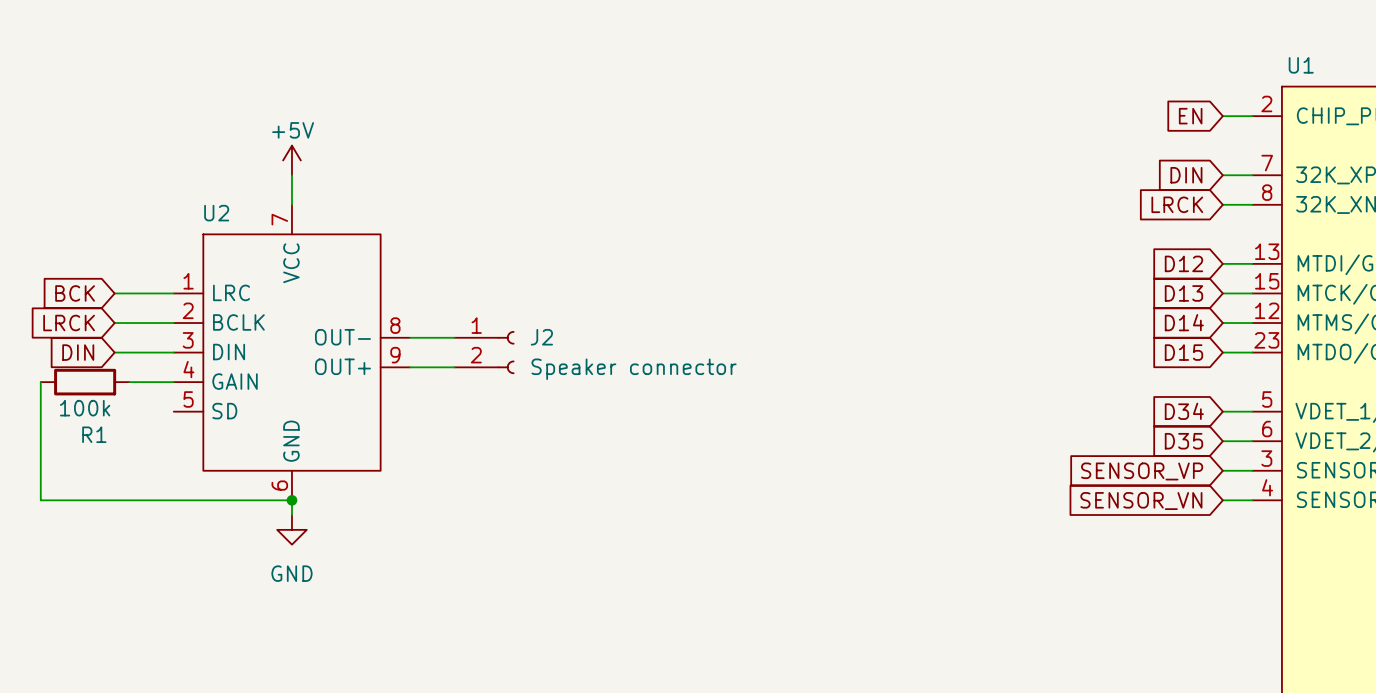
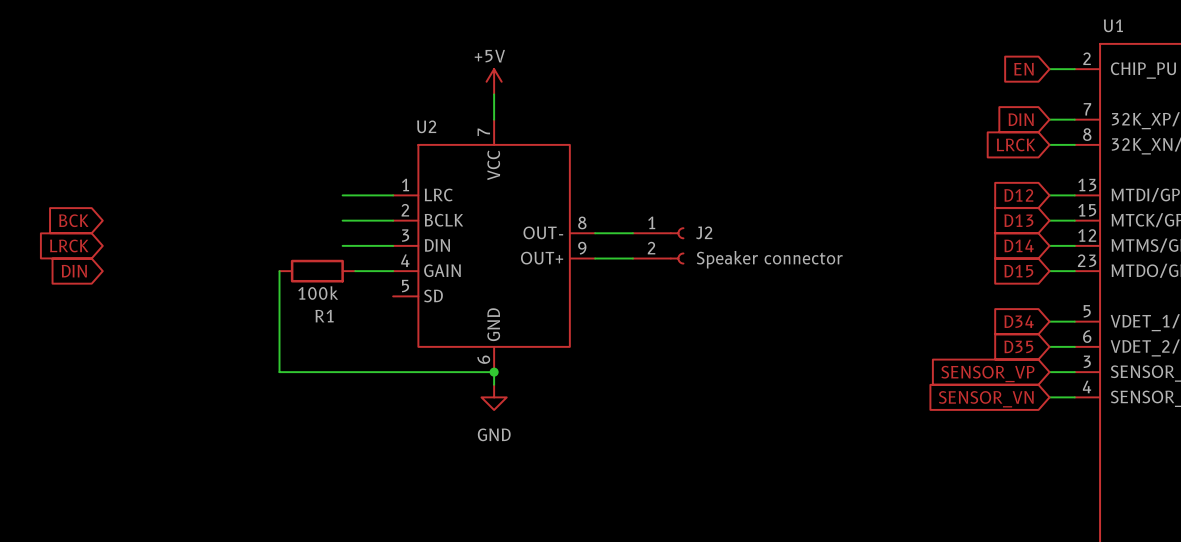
power symbol: none -> +5V (494, 81)
power symbol: +5V (291, 160) -> none
wire: (291, 175) (291, 204) -> (494, 94) (494, 119)
wire: (114, 293) (173, 293) -> (342, 195) (393, 195)
wire: (114, 323) (173, 323) -> (342, 220) (393, 220)
wire: (410, 337) (454, 337) -> (595, 233) (632, 233)
wire: (114, 352) (173, 352) -> (342, 245) (393, 245)
U2 position: (291, 352) -> (494, 245)
J2 position: (484, 352) -> (658, 245)
wire: (410, 367) (454, 367) -> (595, 258) (632, 258)
wire: (40, 382) (40, 500) (291, 500) (291, 515) -> (279, 271) (279, 372) (494, 372) (494, 384)
R1 position: (85, 382) -> (317, 271)
wire: (129, 382) (173, 382) -> (355, 271) (393, 271)
junction: none -> (494, 372)
junction: (291, 500) -> none
power symbol position: GND (291, 529) -> GND (494, 397)

